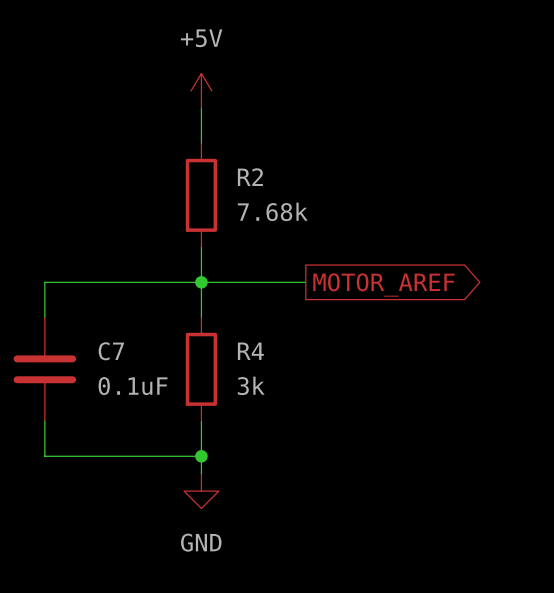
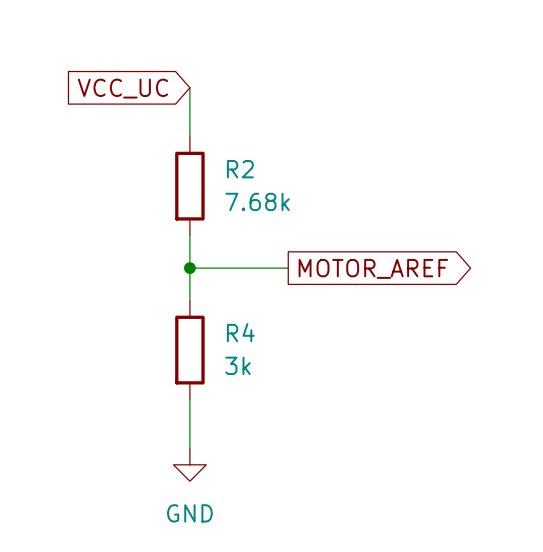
power symbol: +5V (201, 90) -> none
global label: none -> VCC_UC (122, 88)
wire: (201, 282) (44, 282) (44, 317) -> none
C7: 0.1uF (44, 369) -> none
wire: (44, 421) (44, 456) (201, 456) -> none
junction: (201, 456) -> none

